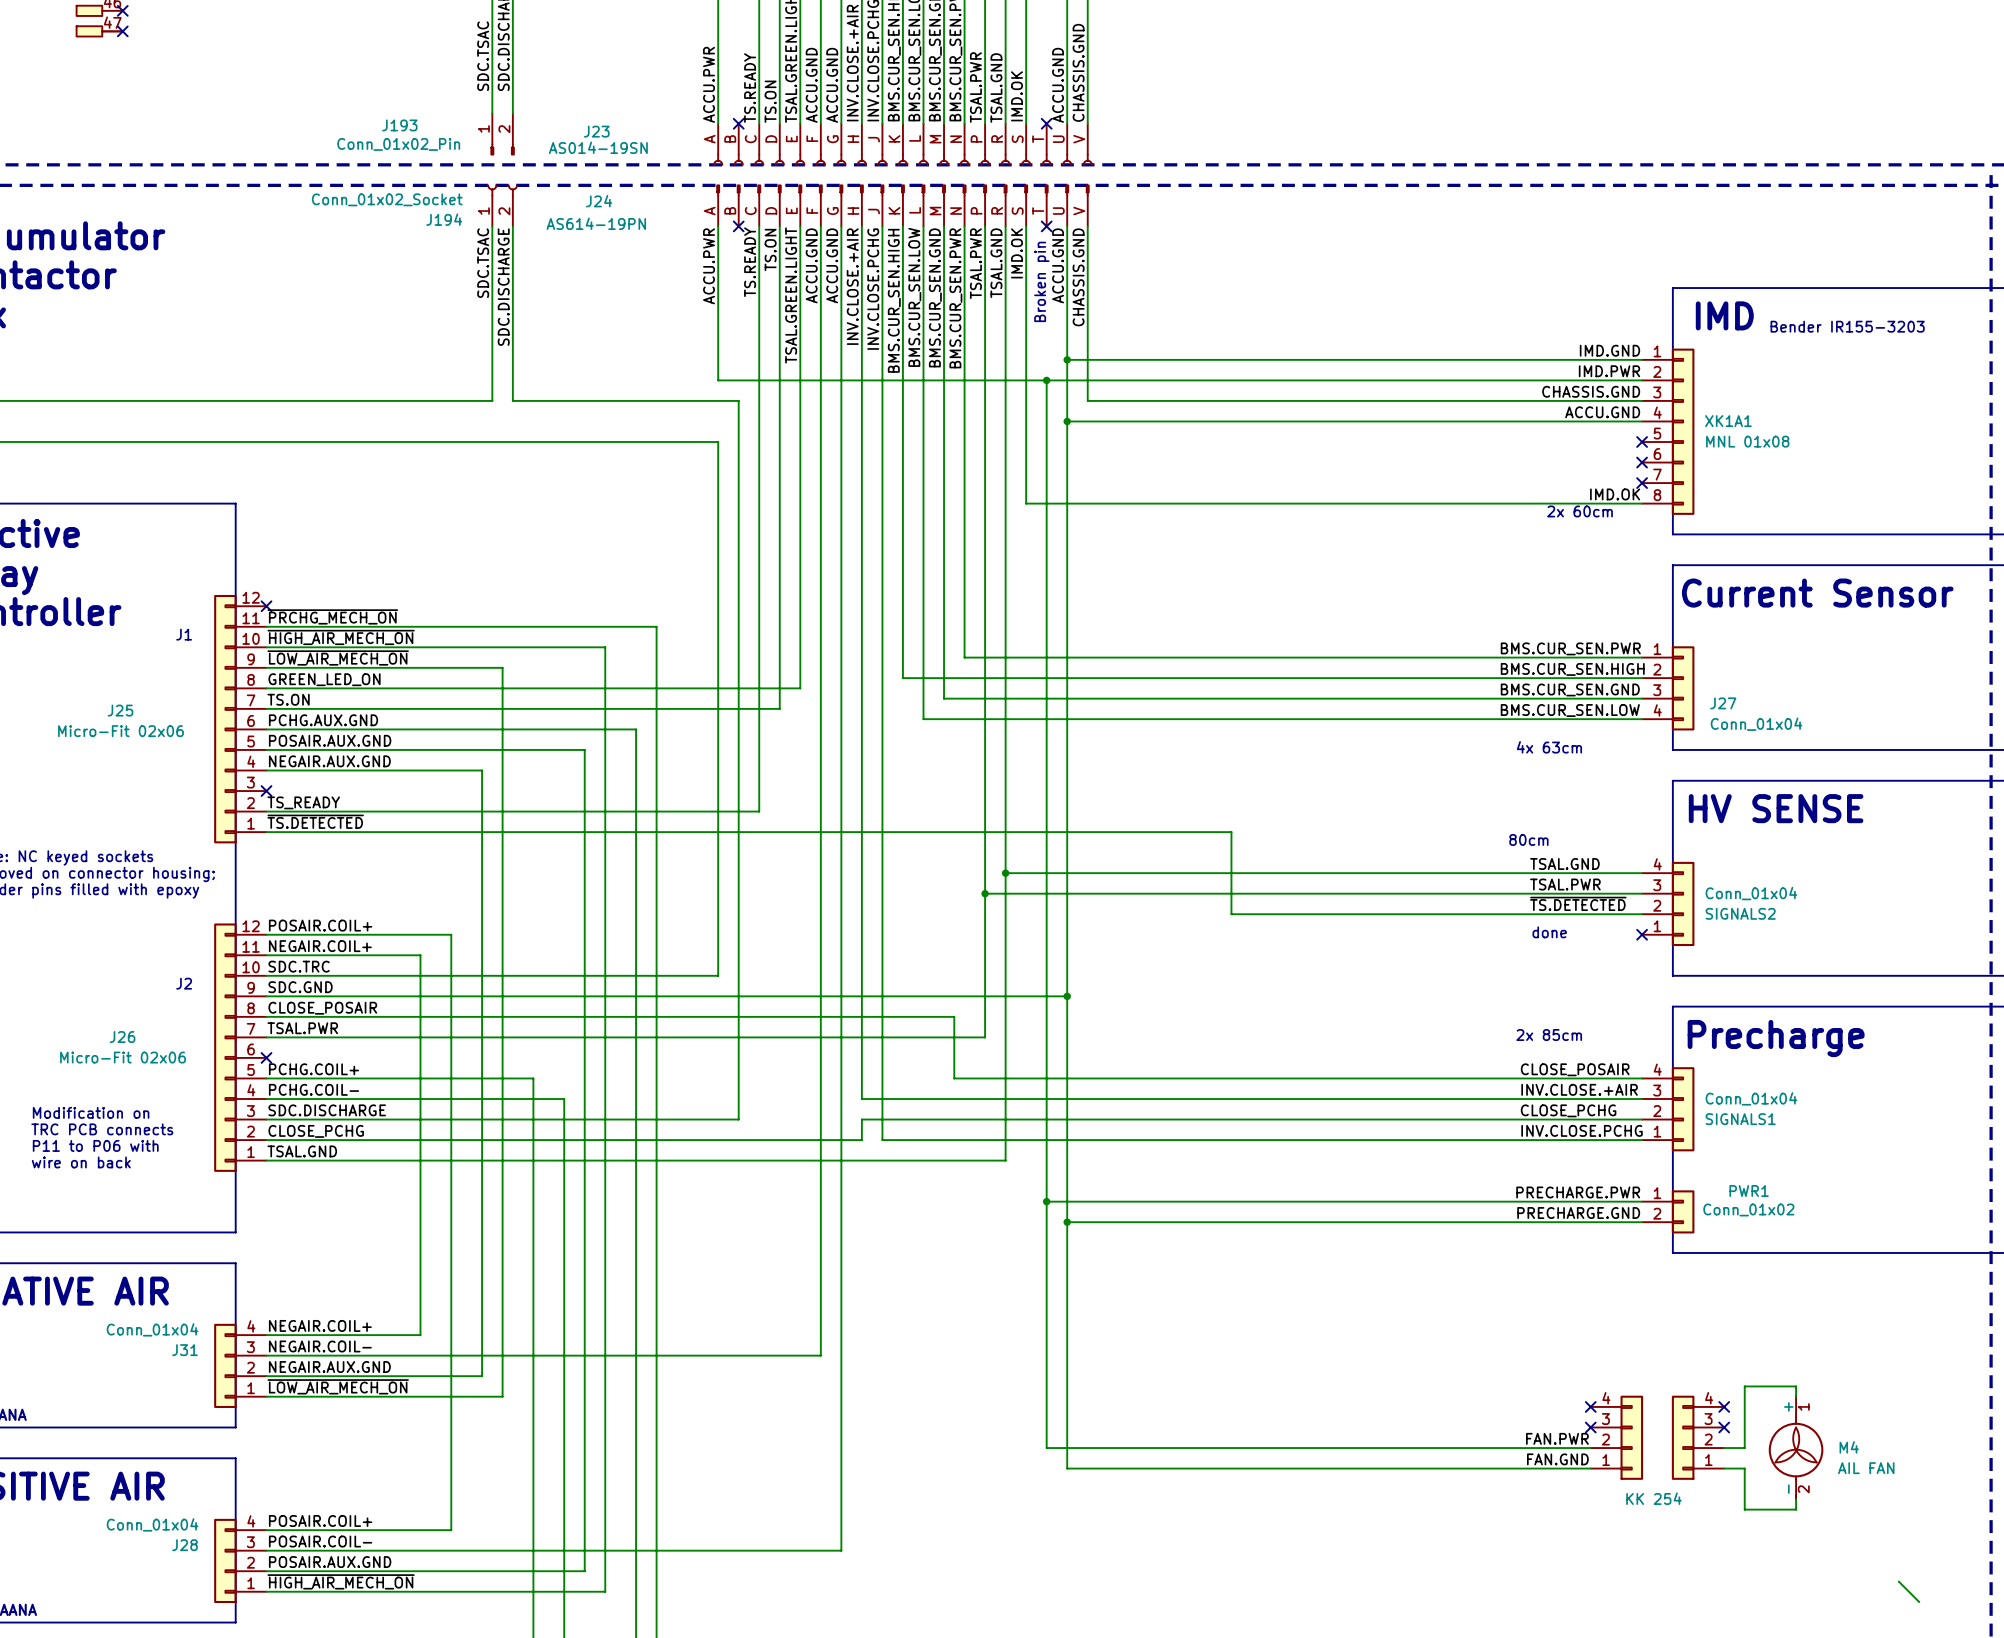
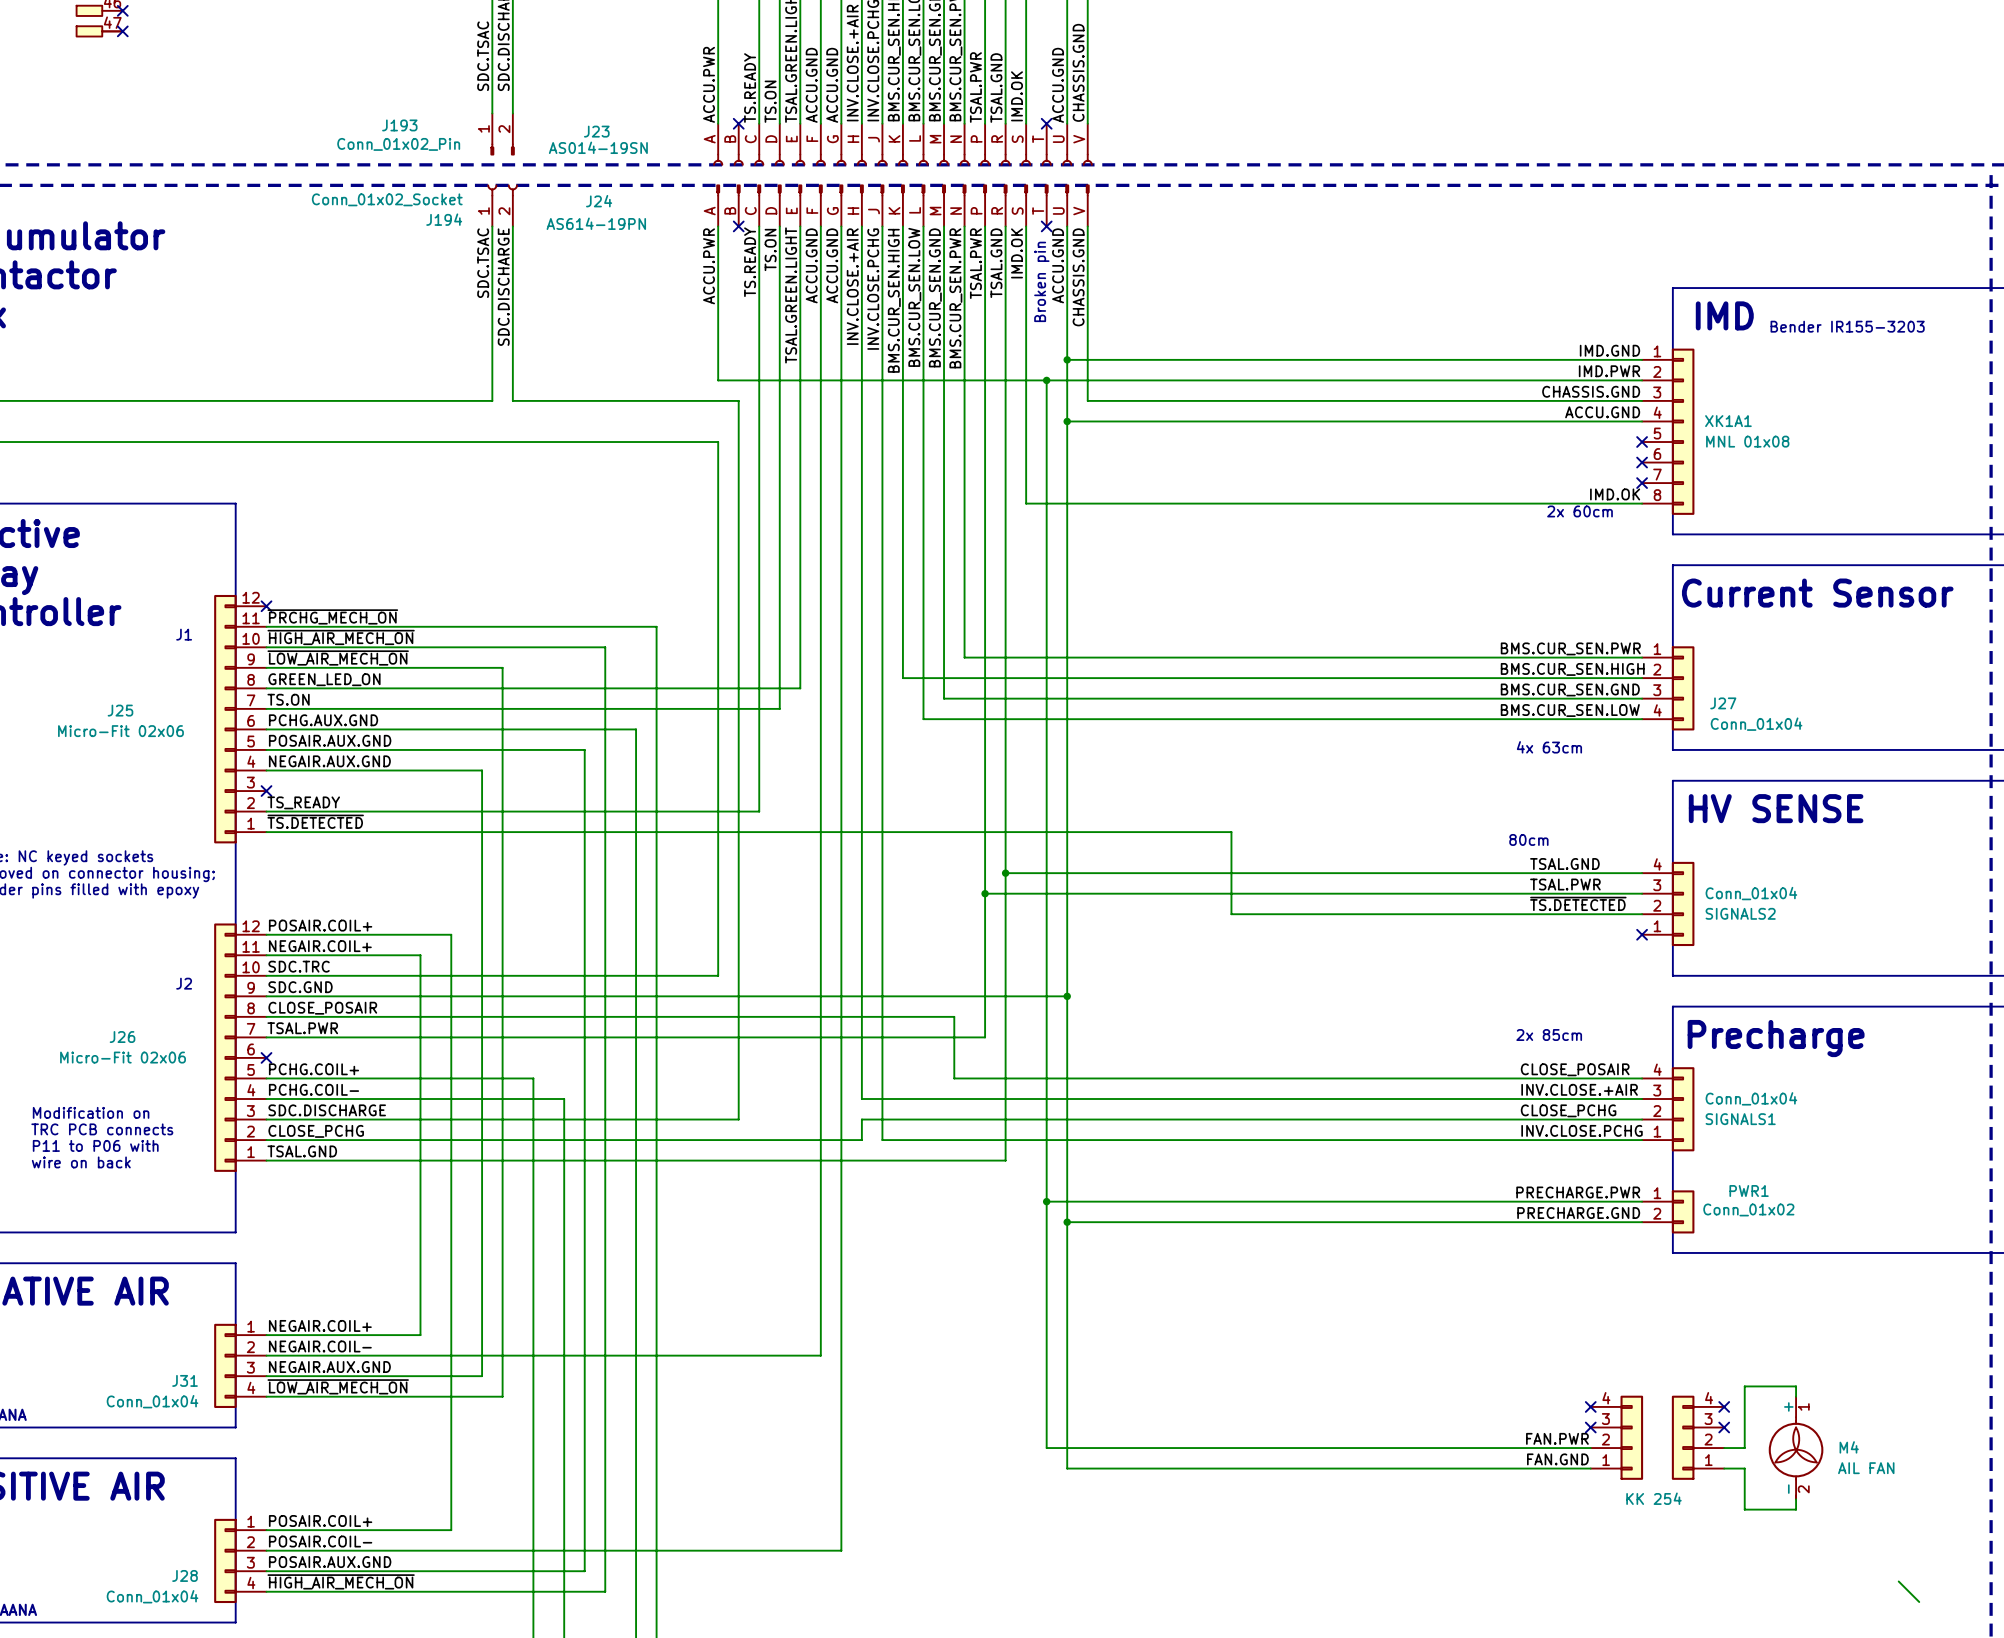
text: done (1549, 932) -> none
J31 flip: as is (225, 1365) -> up-down (225, 1365)
J28 flip: as is (225, 1560) -> up-down (225, 1560)

